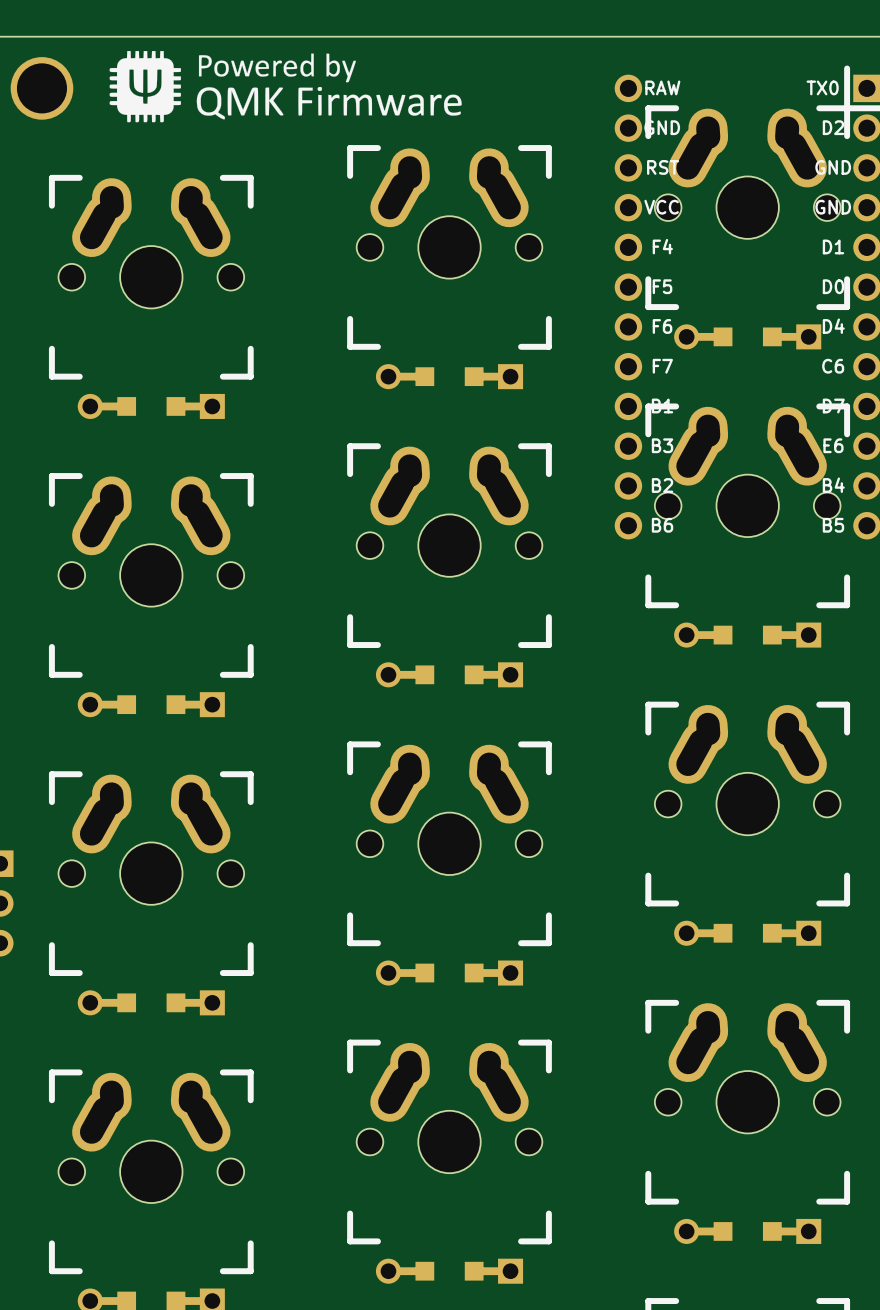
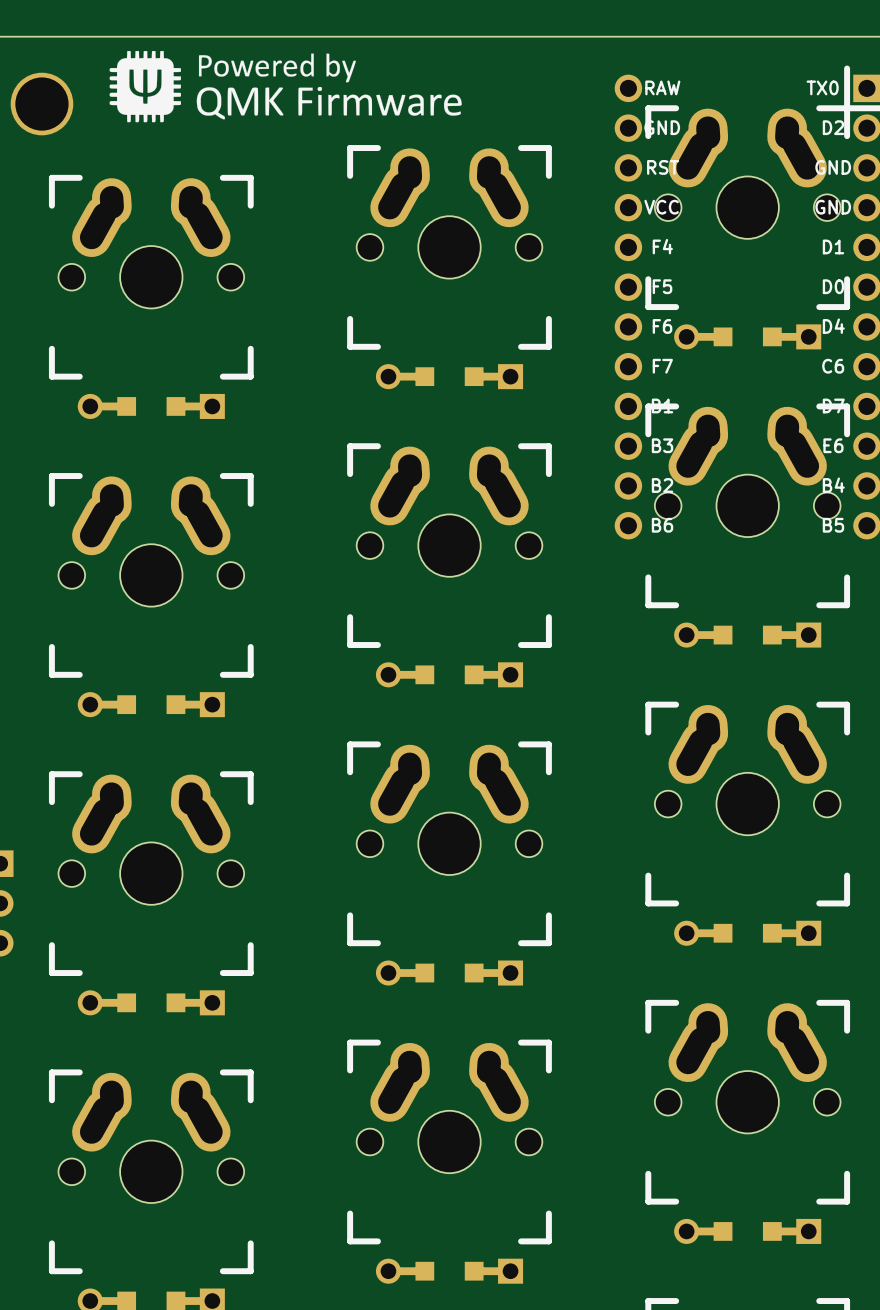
part footprint: [10, 57, 74, 120] -> [10, 72, 74, 136]

